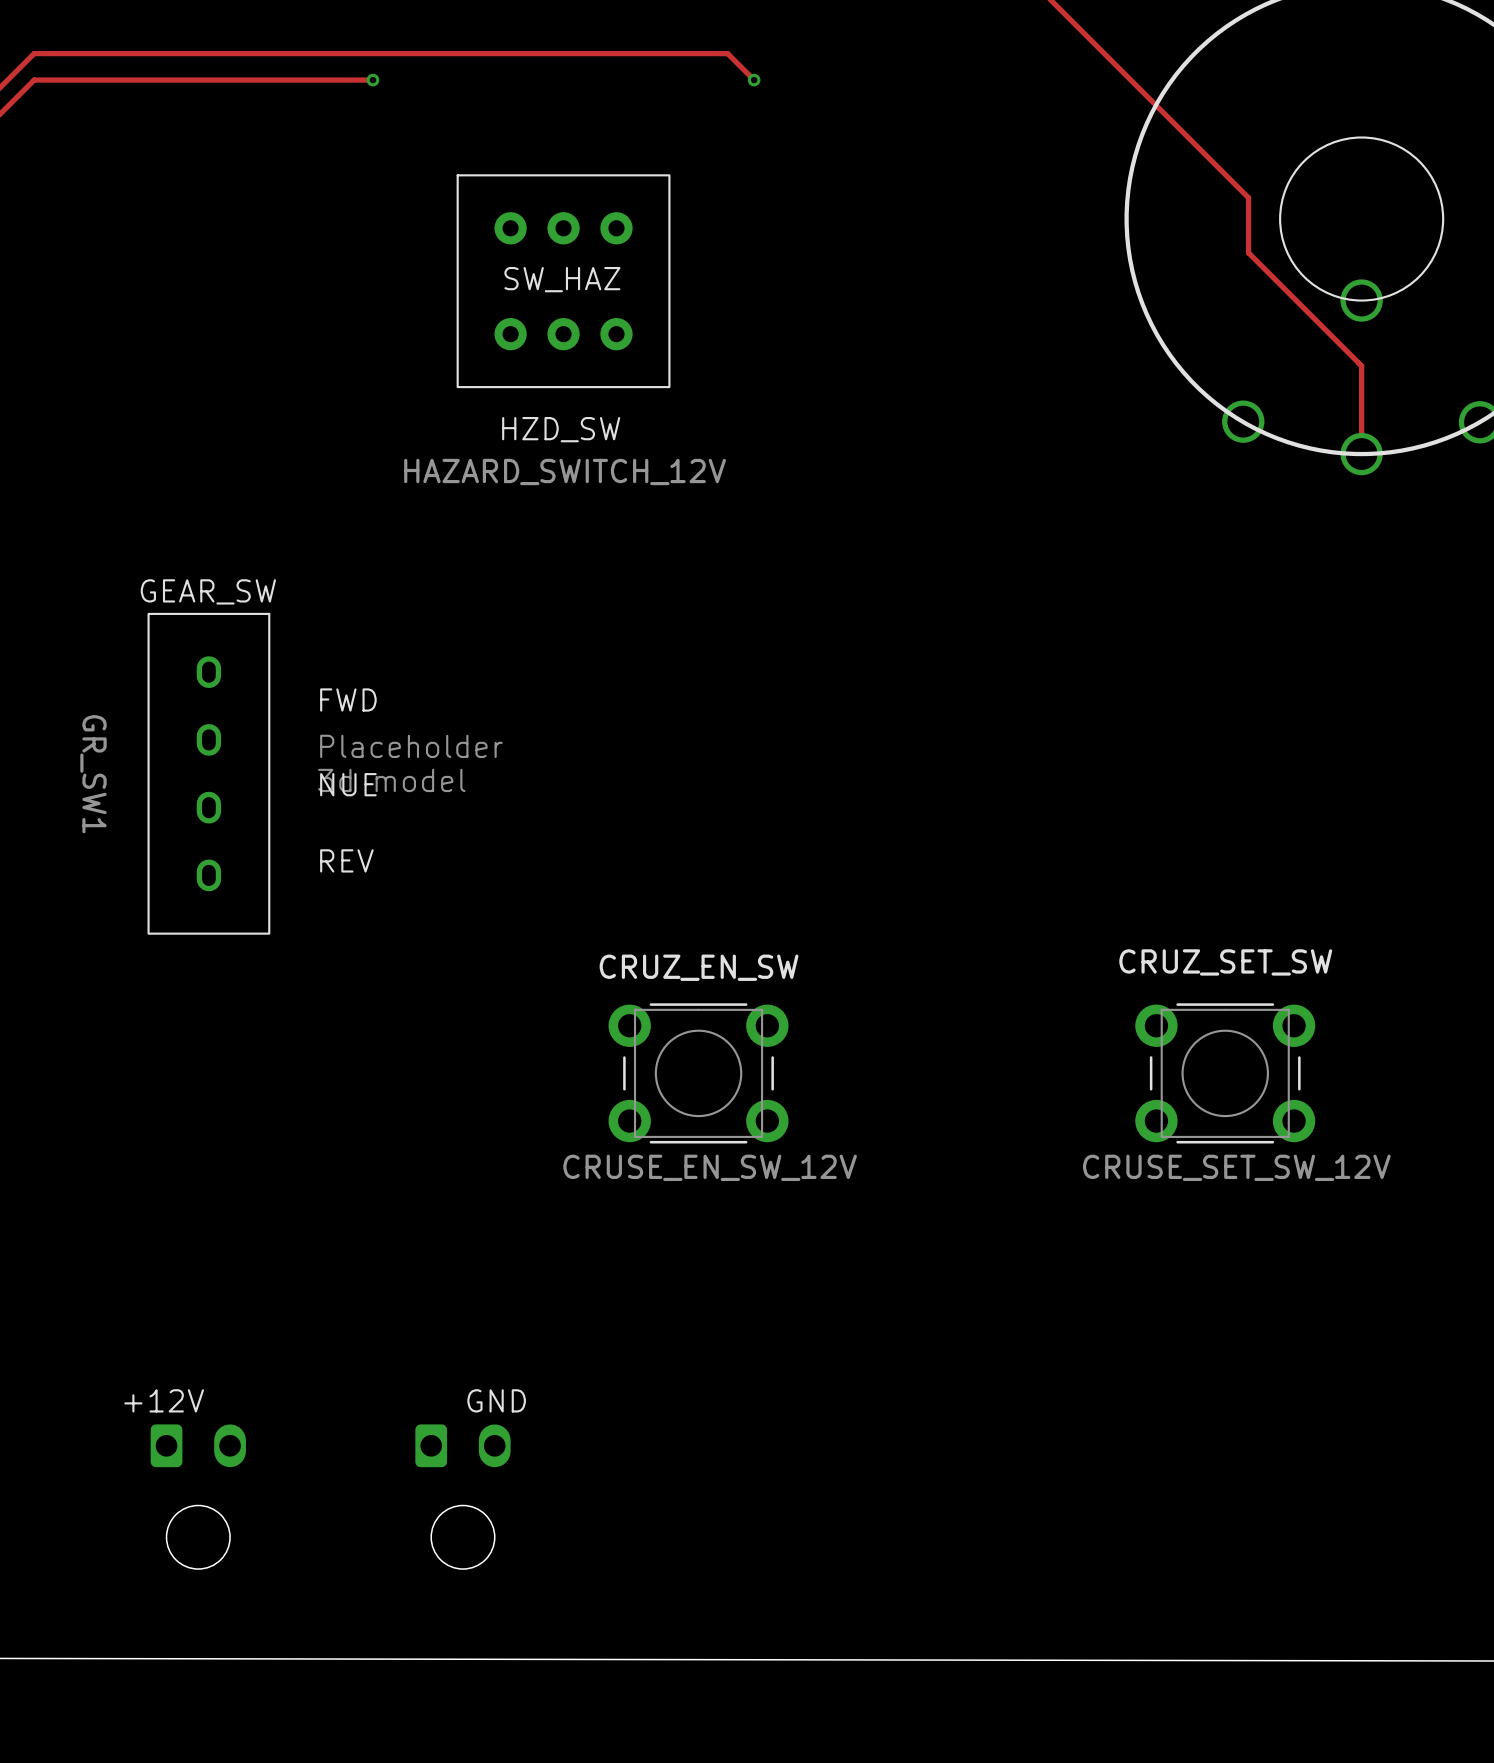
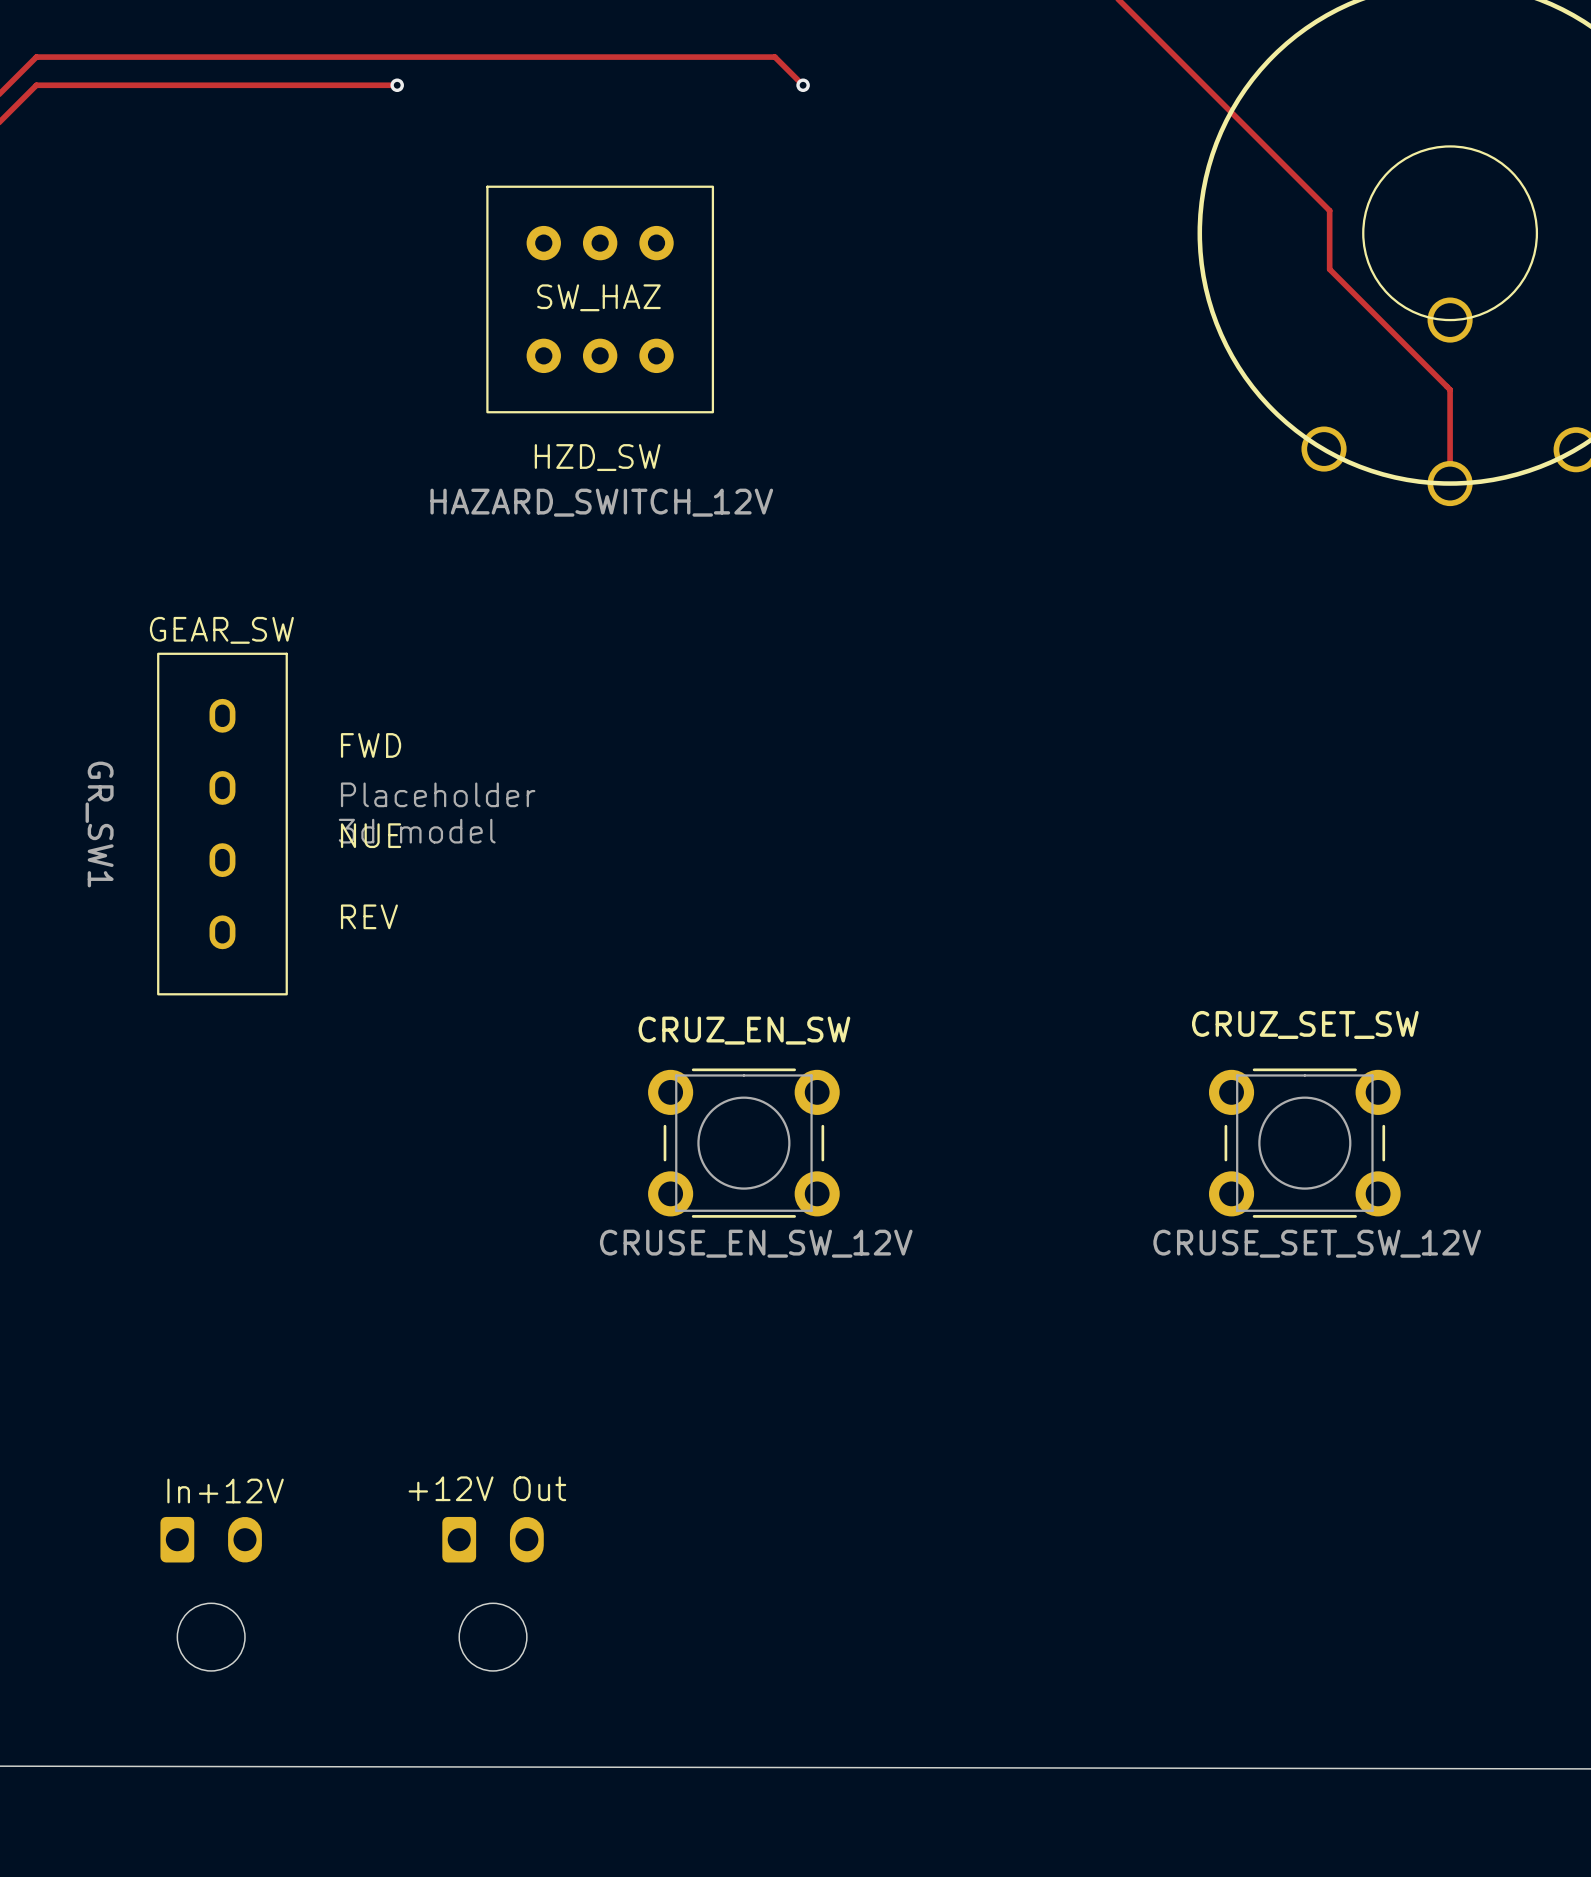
text: none -> +12V (451, 1488)
text position: +12V (164, 1400) -> +12V (241, 1491)
text: none -> In (178, 1491)
text: GND (496, 1400) -> Out (539, 1488)

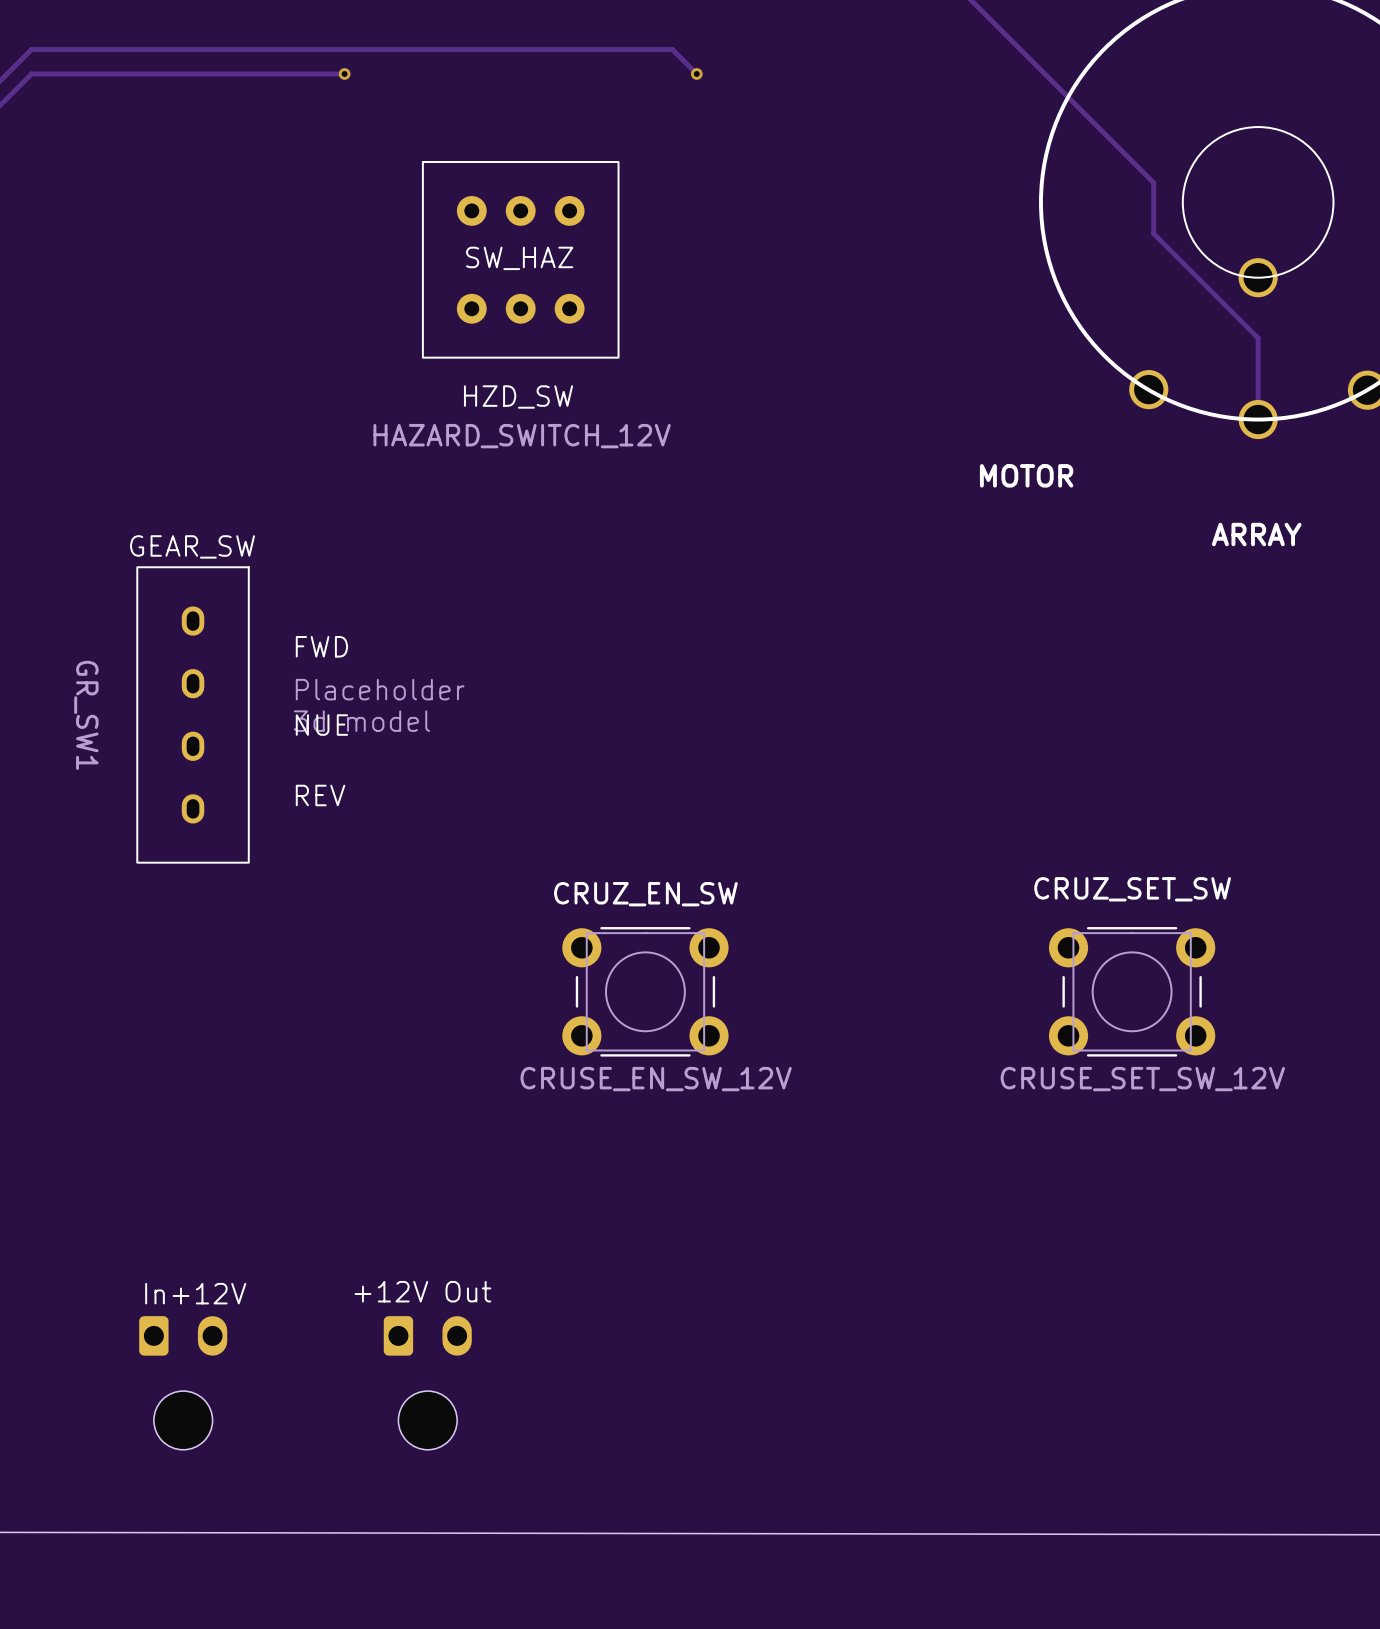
text: none -> MOTOR (1026, 475)
text: none -> ARRAY (1256, 534)

